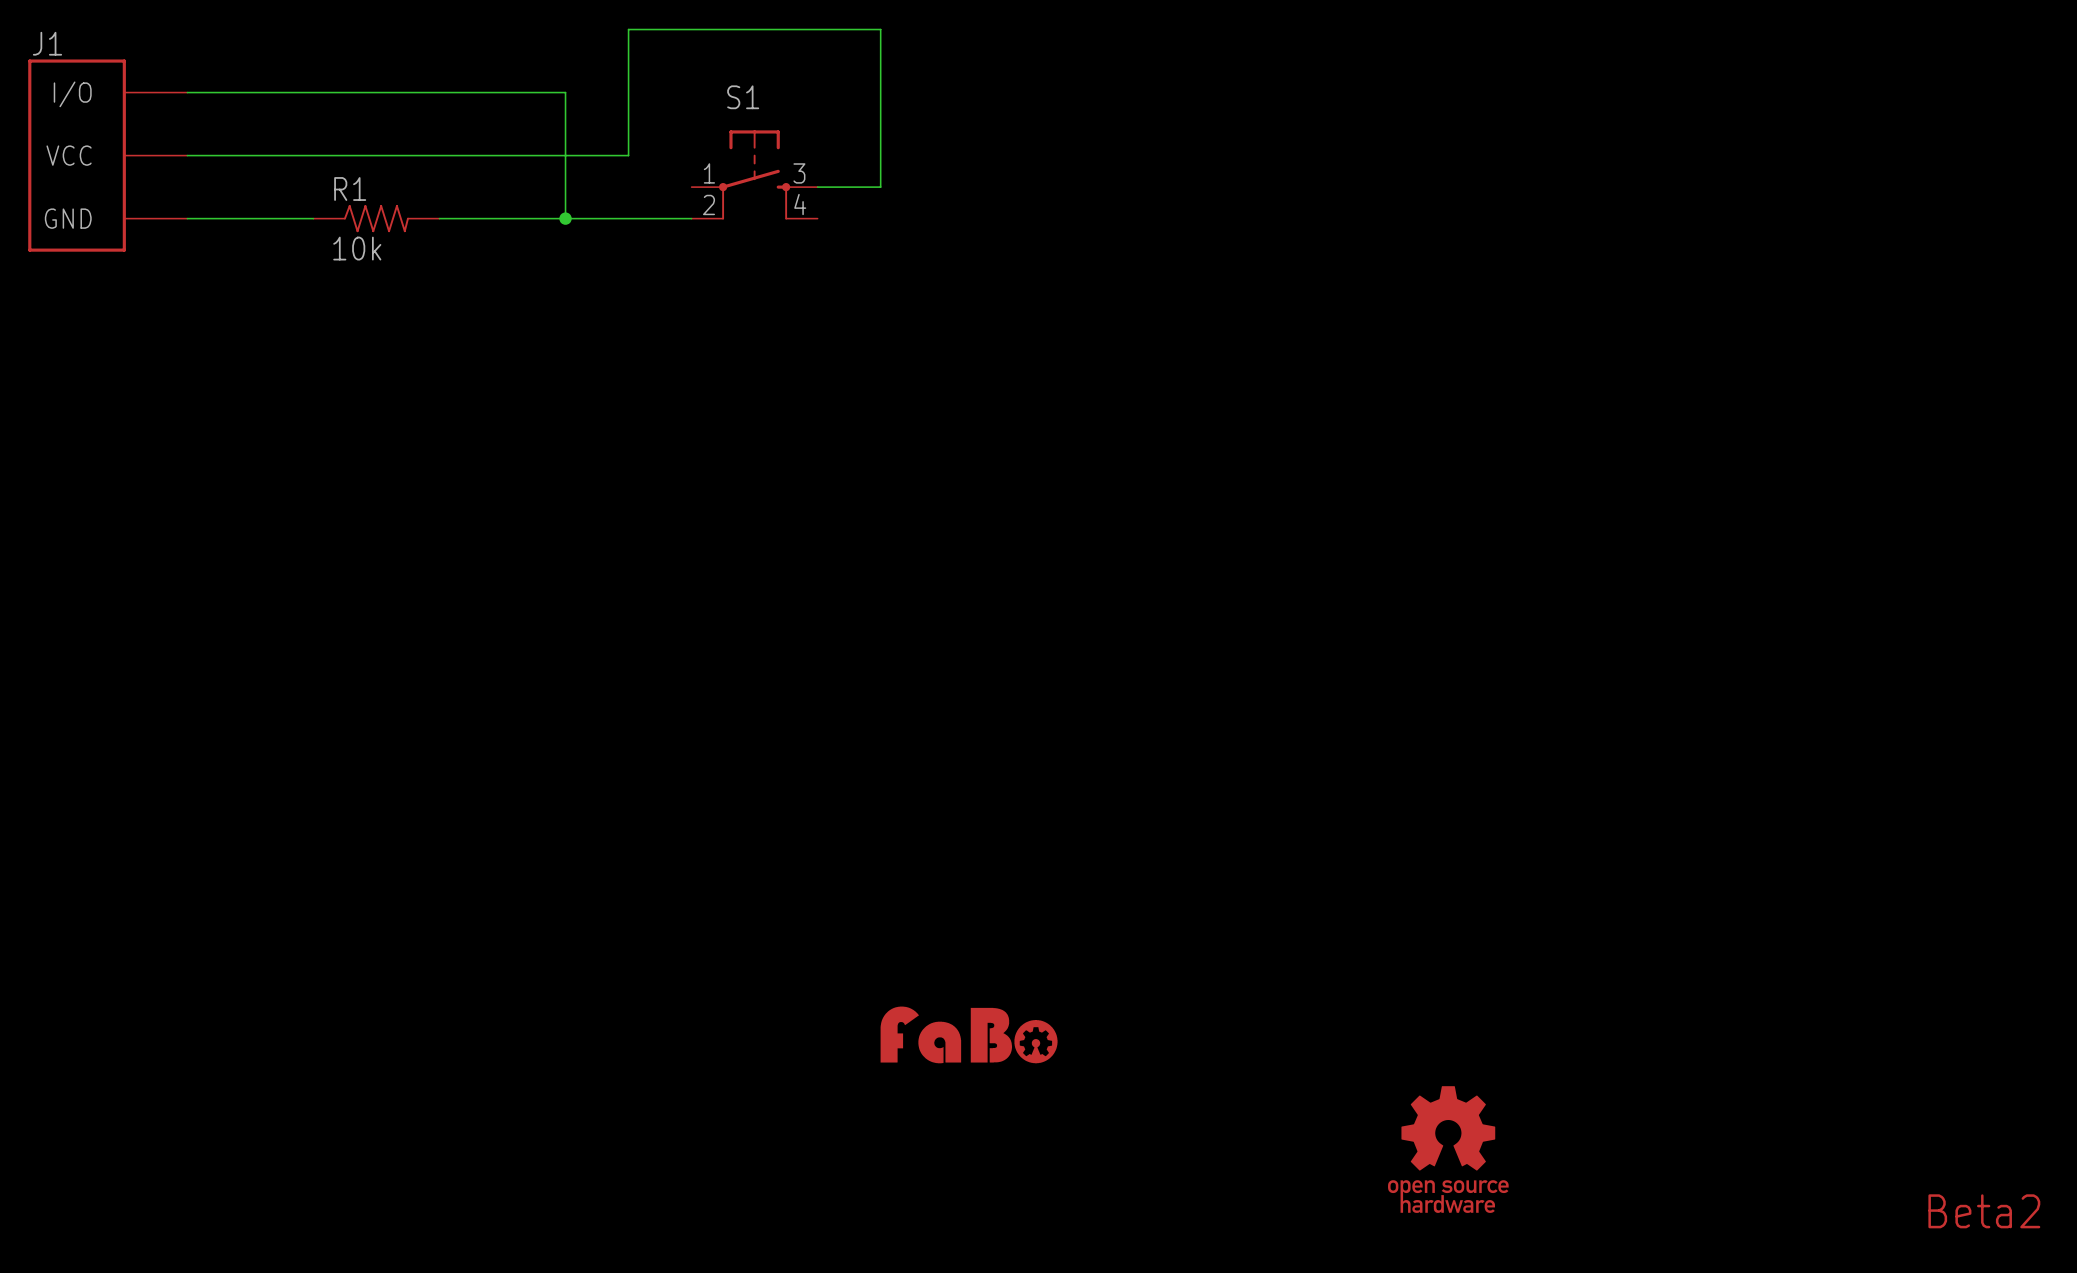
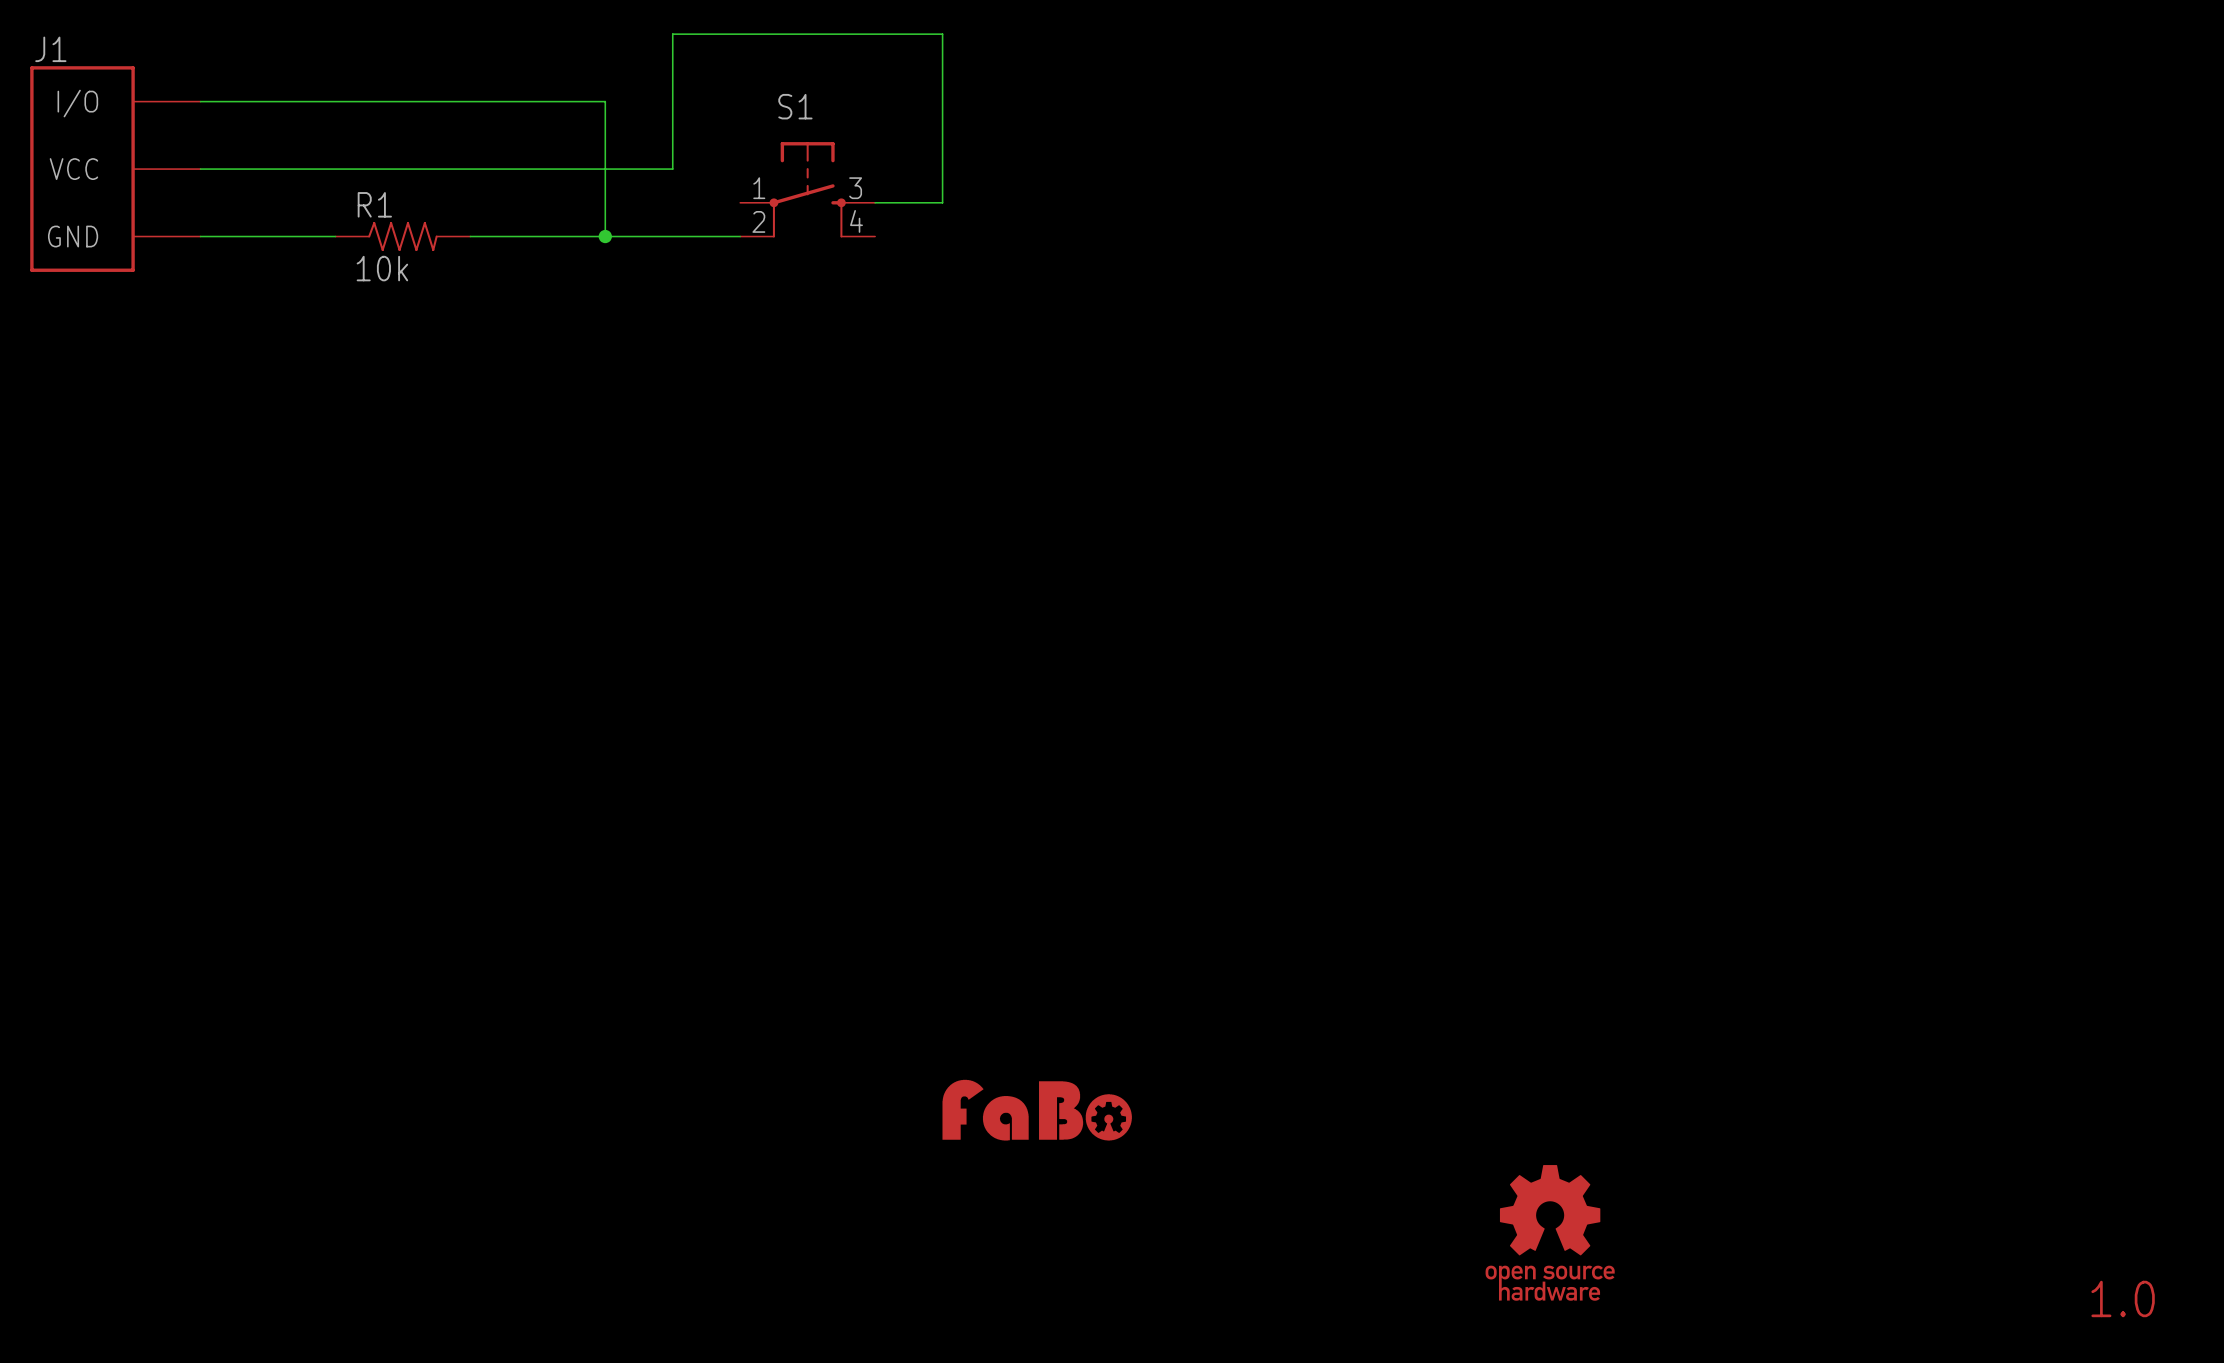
text: Beta2 (1984, 1211) -> 1.0 (2123, 1298)

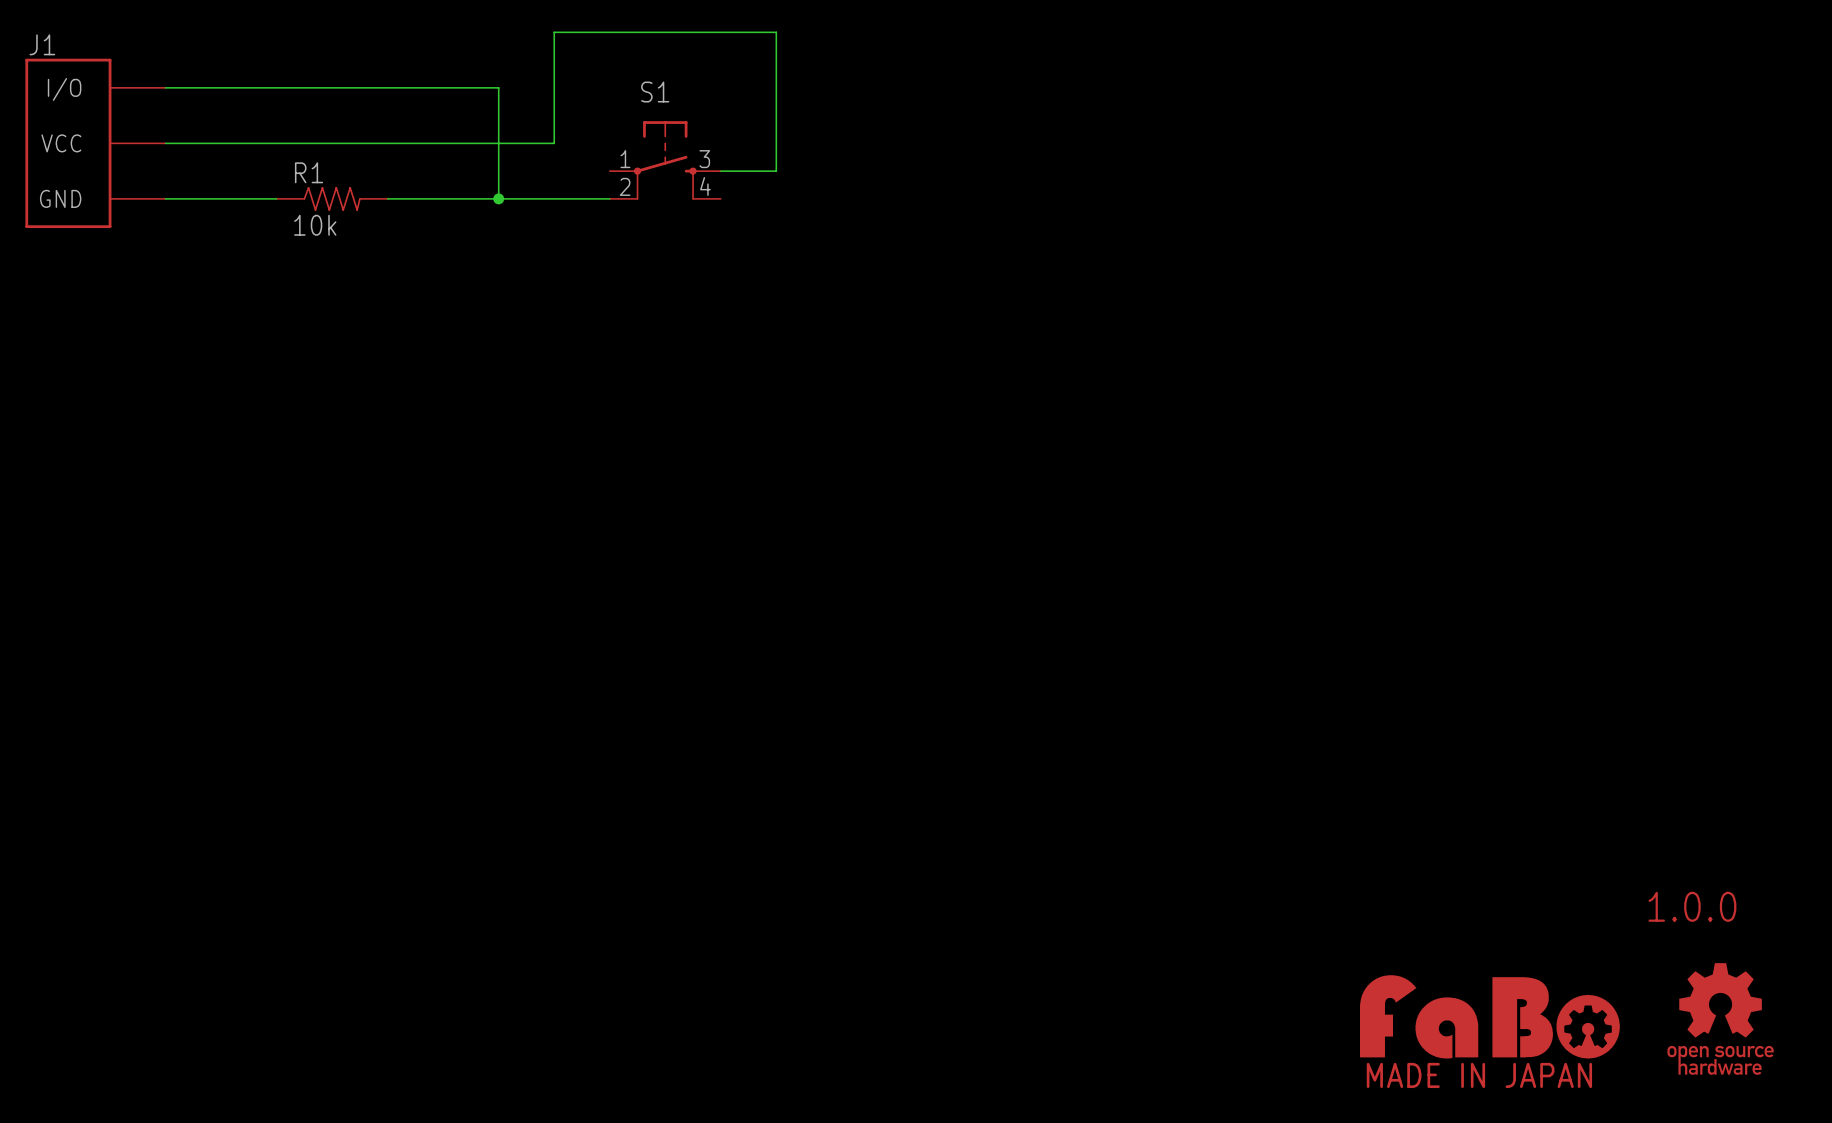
text: none -> 1.0.0 (1692, 906)
part: (1037, 1110) -> none
part: none -> (1489, 1016)
part: (1550, 1232) -> none
part: none -> (1720, 1018)
text: 1.0 (2123, 1298) -> none

